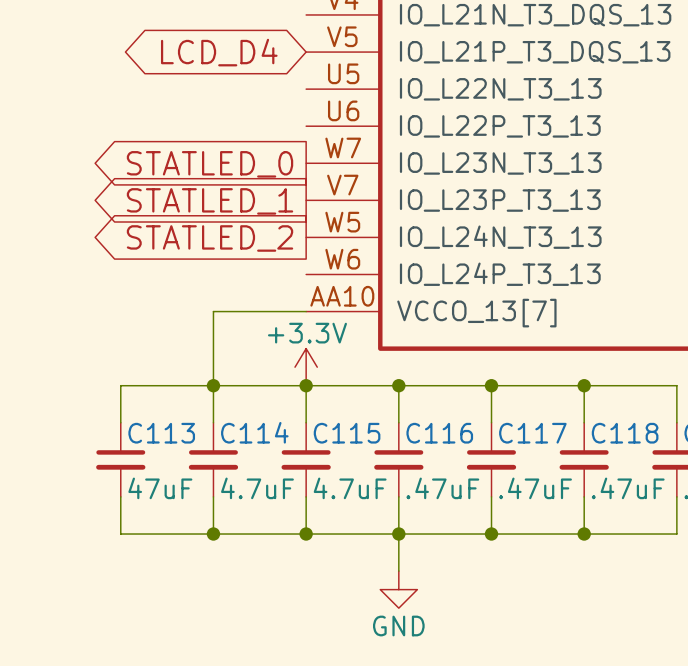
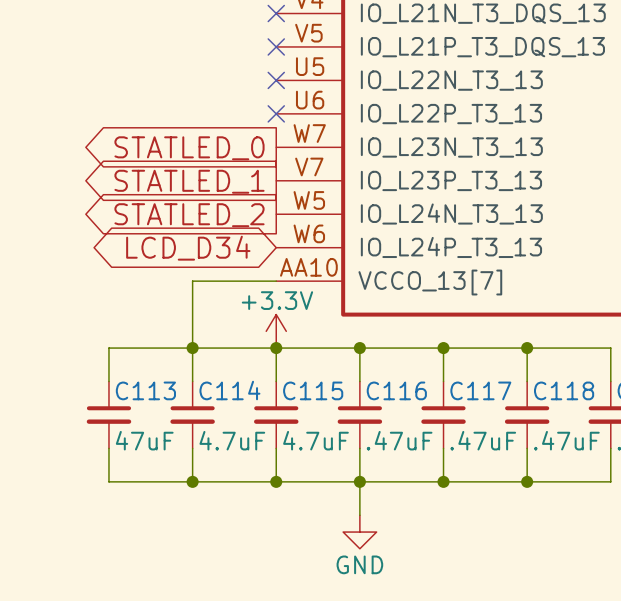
no-connect mark: none -> (276, 13)
global label: LCD_D4 (219, 52) -> none
no-connect mark: none -> (276, 46)
no-connect mark: none -> (276, 80)
no-connect mark: none -> (276, 113)
global label: none -> LCD_D34 (188, 248)

